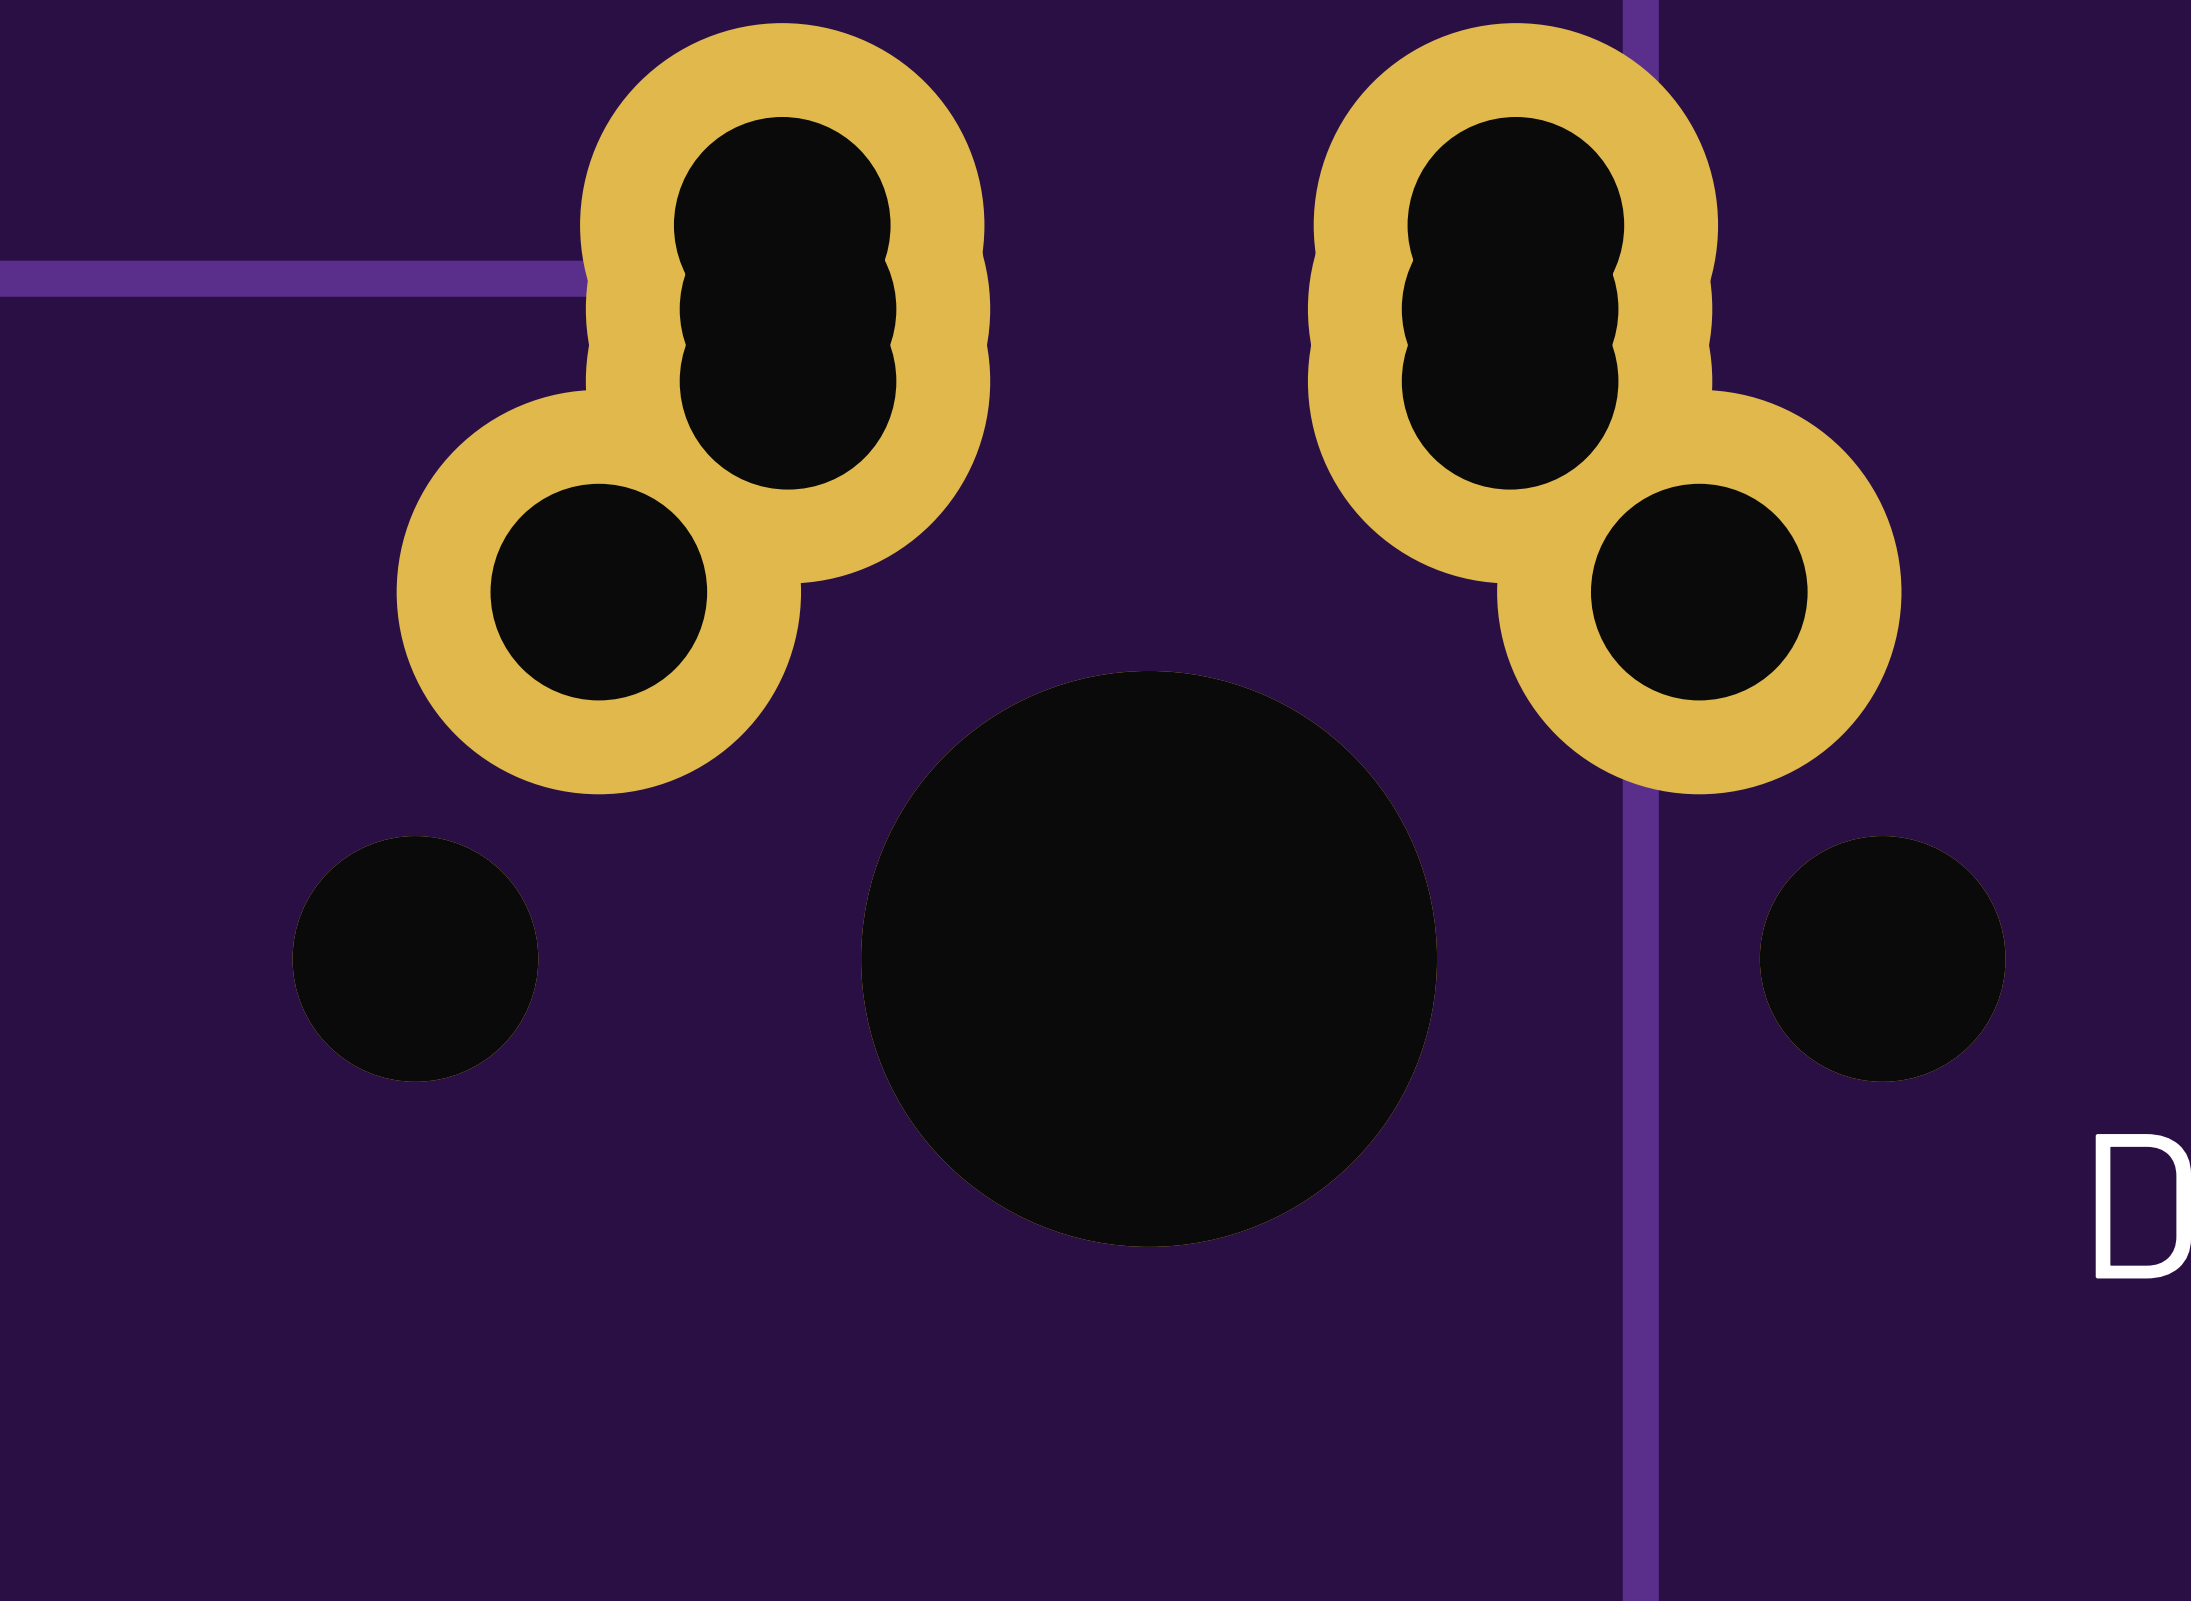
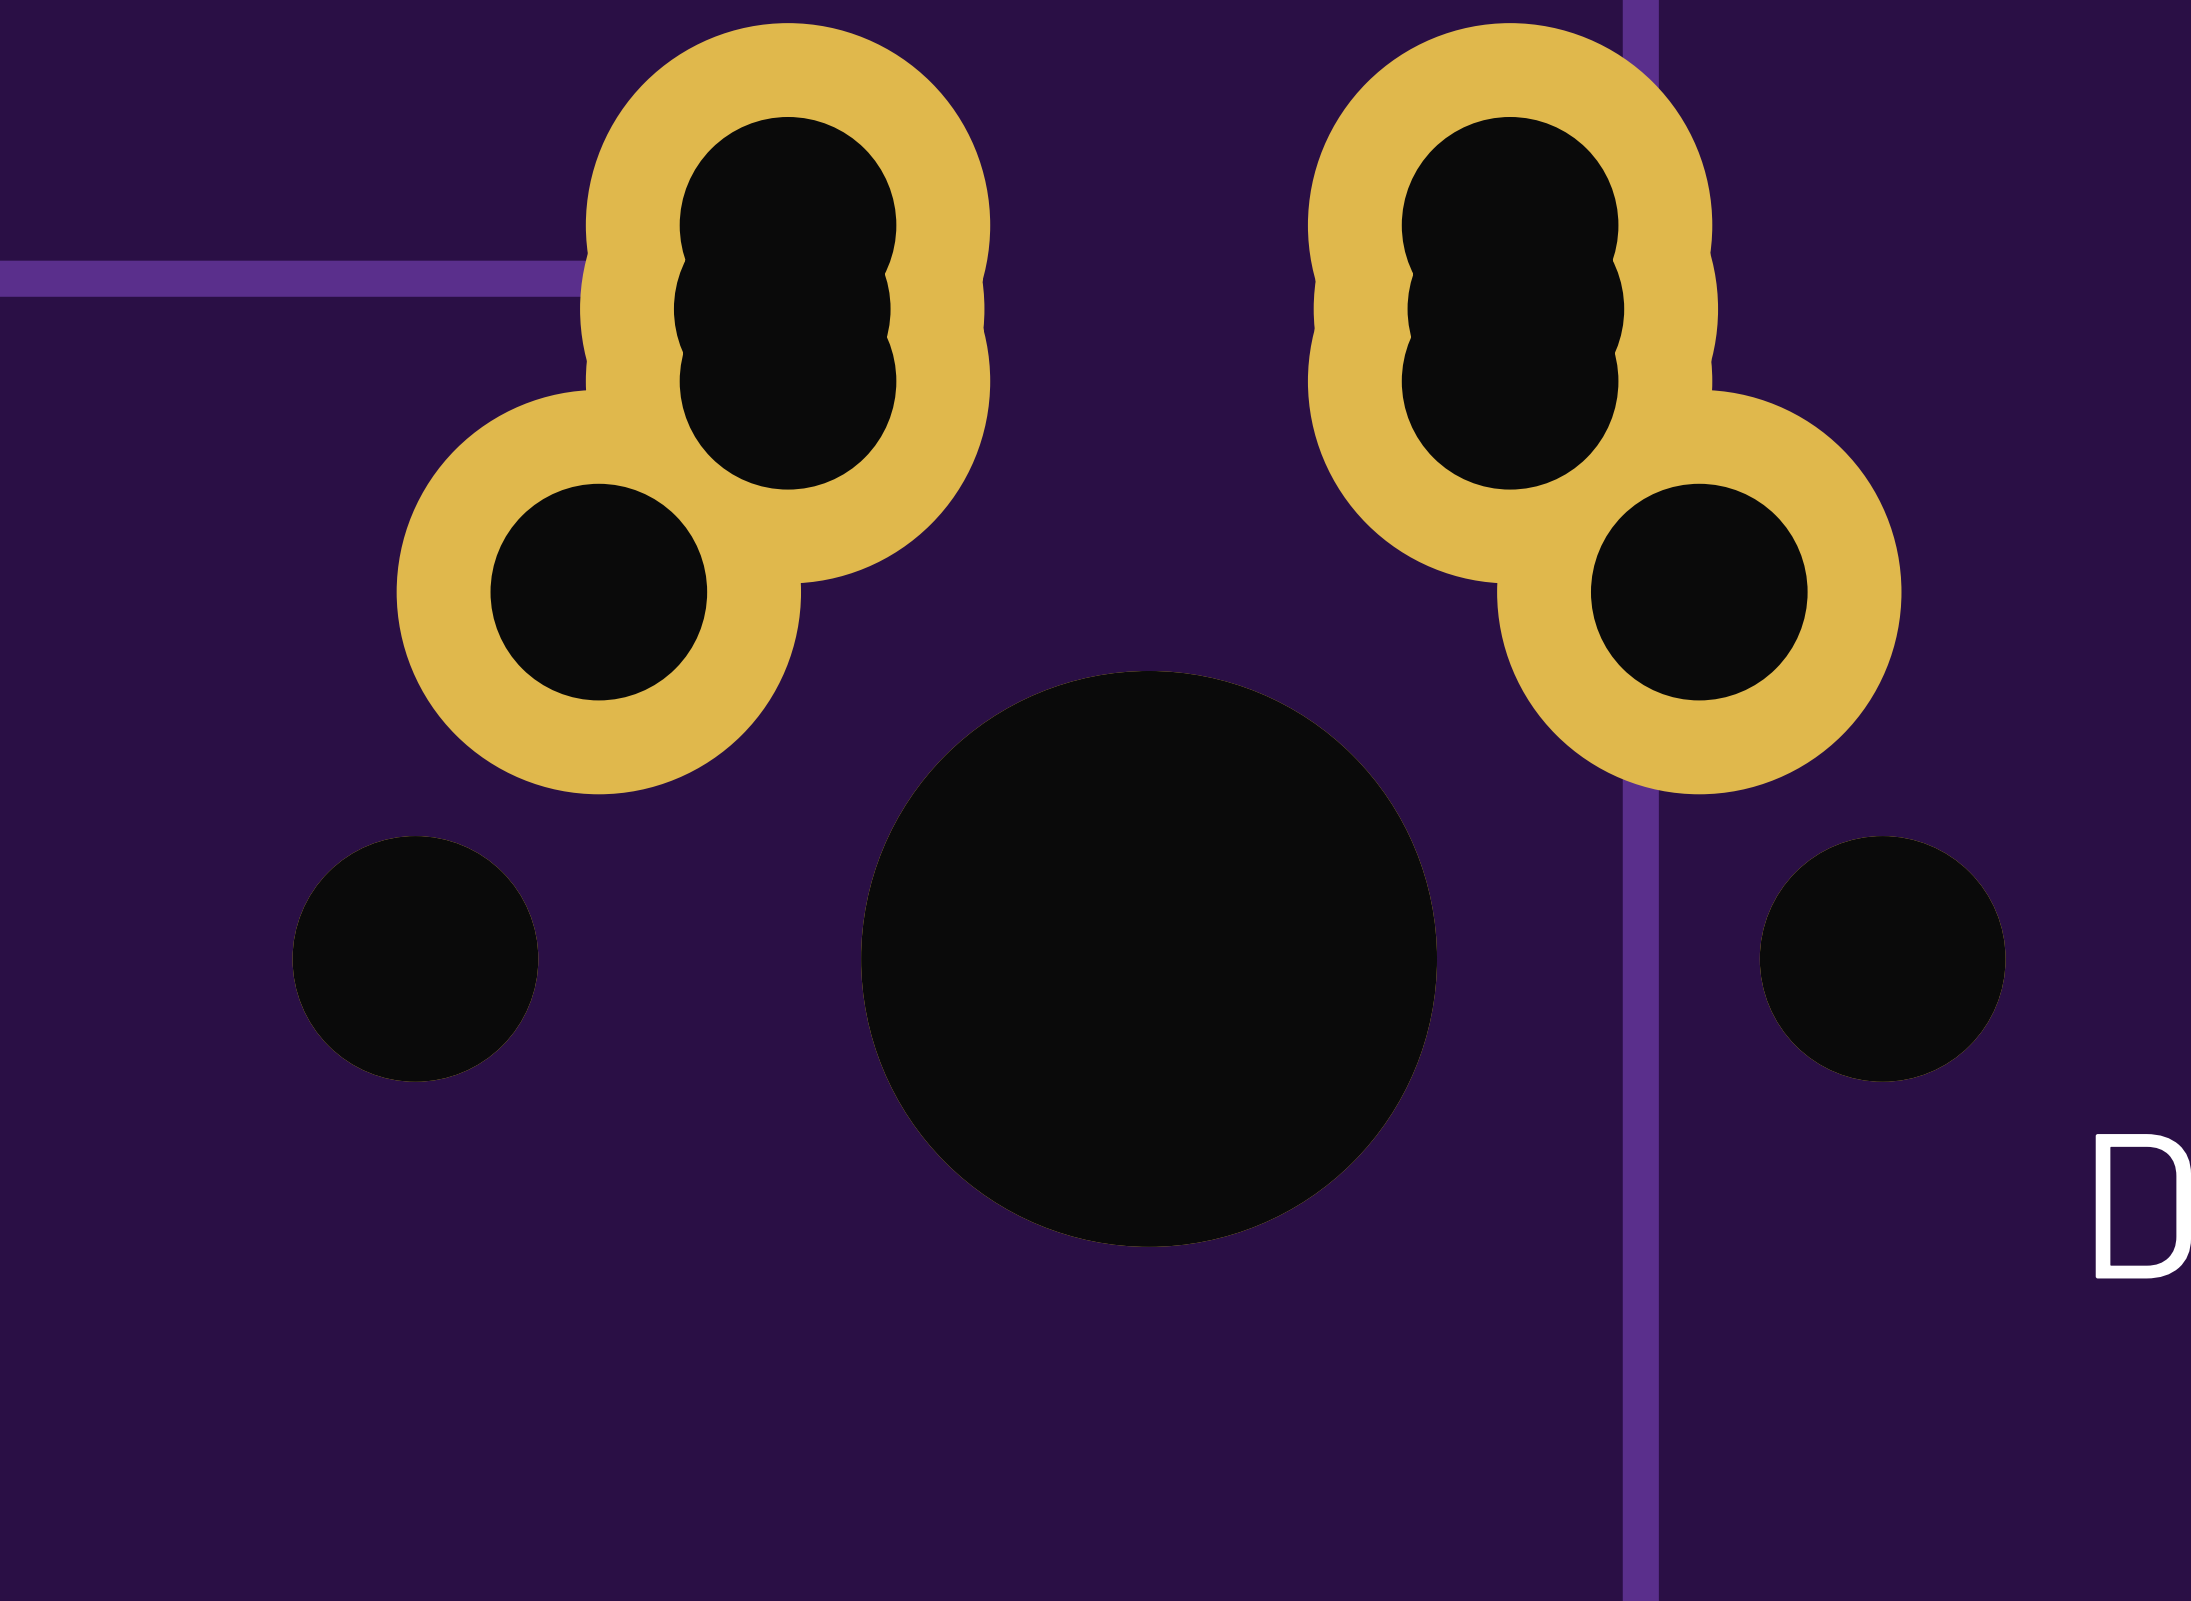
part footprint: [292, 23, 2006, 1247] -> [292, 23, 2006, 1247]

